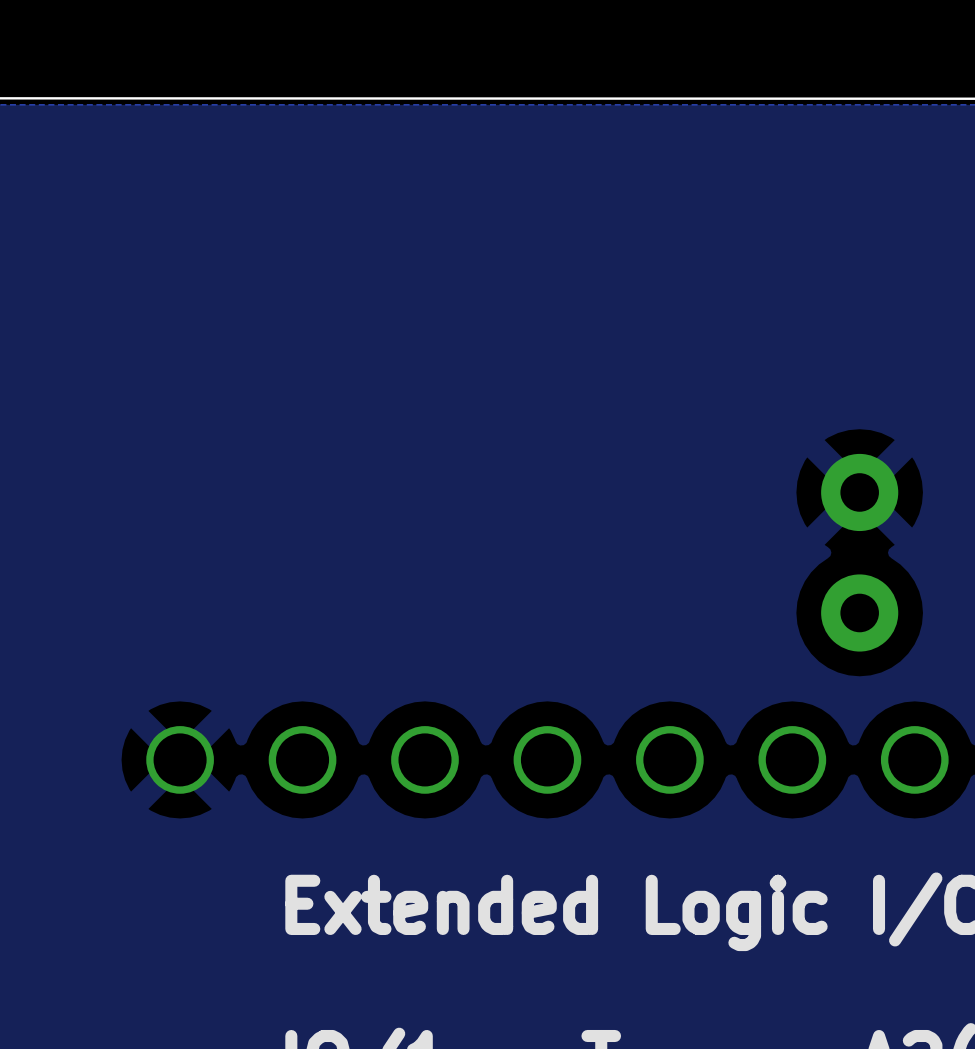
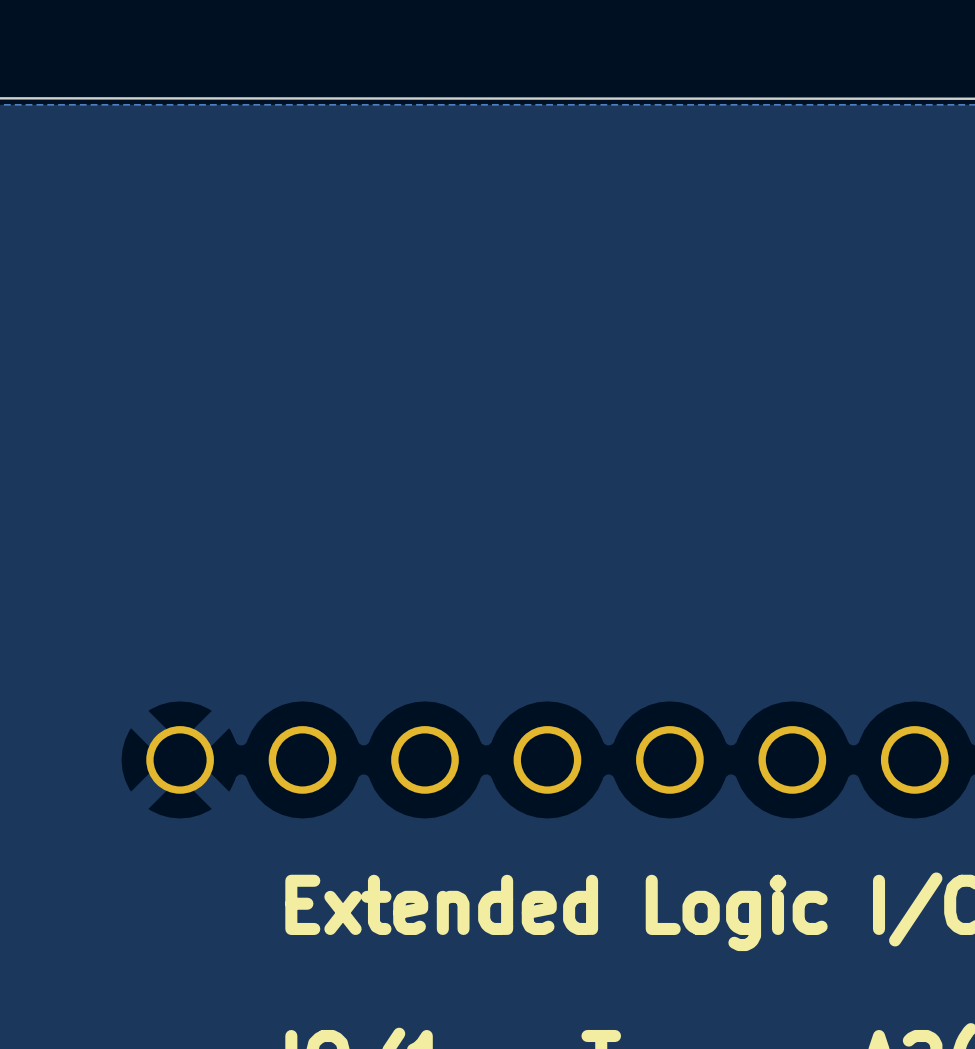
part: (859, 552) -> none

